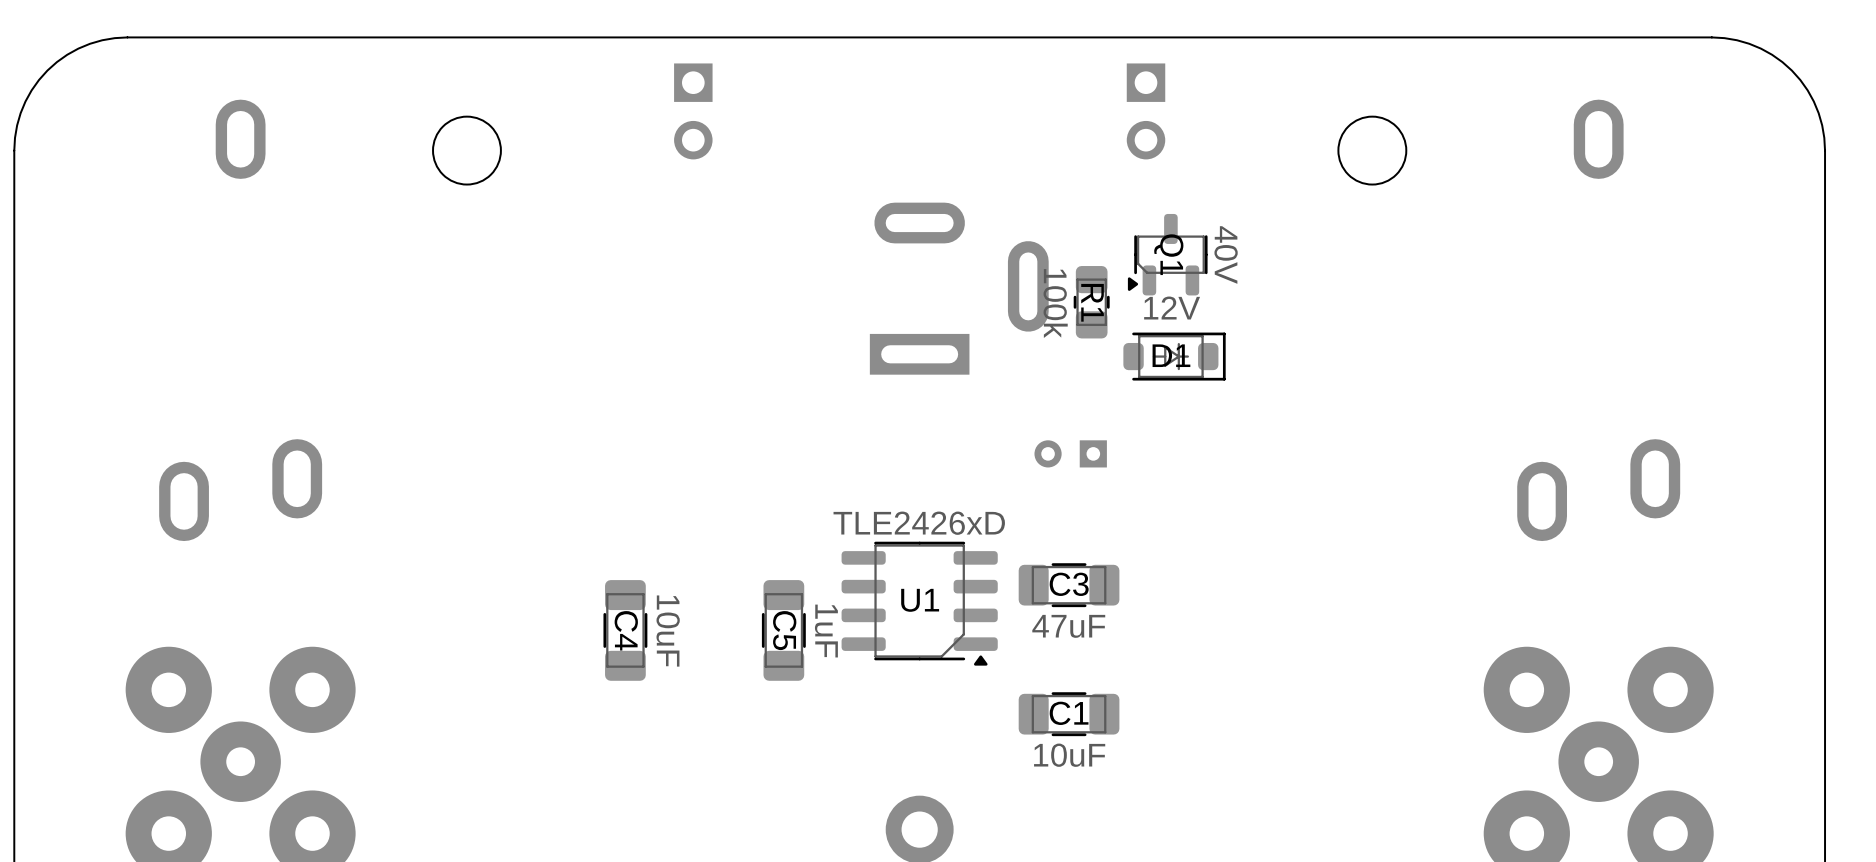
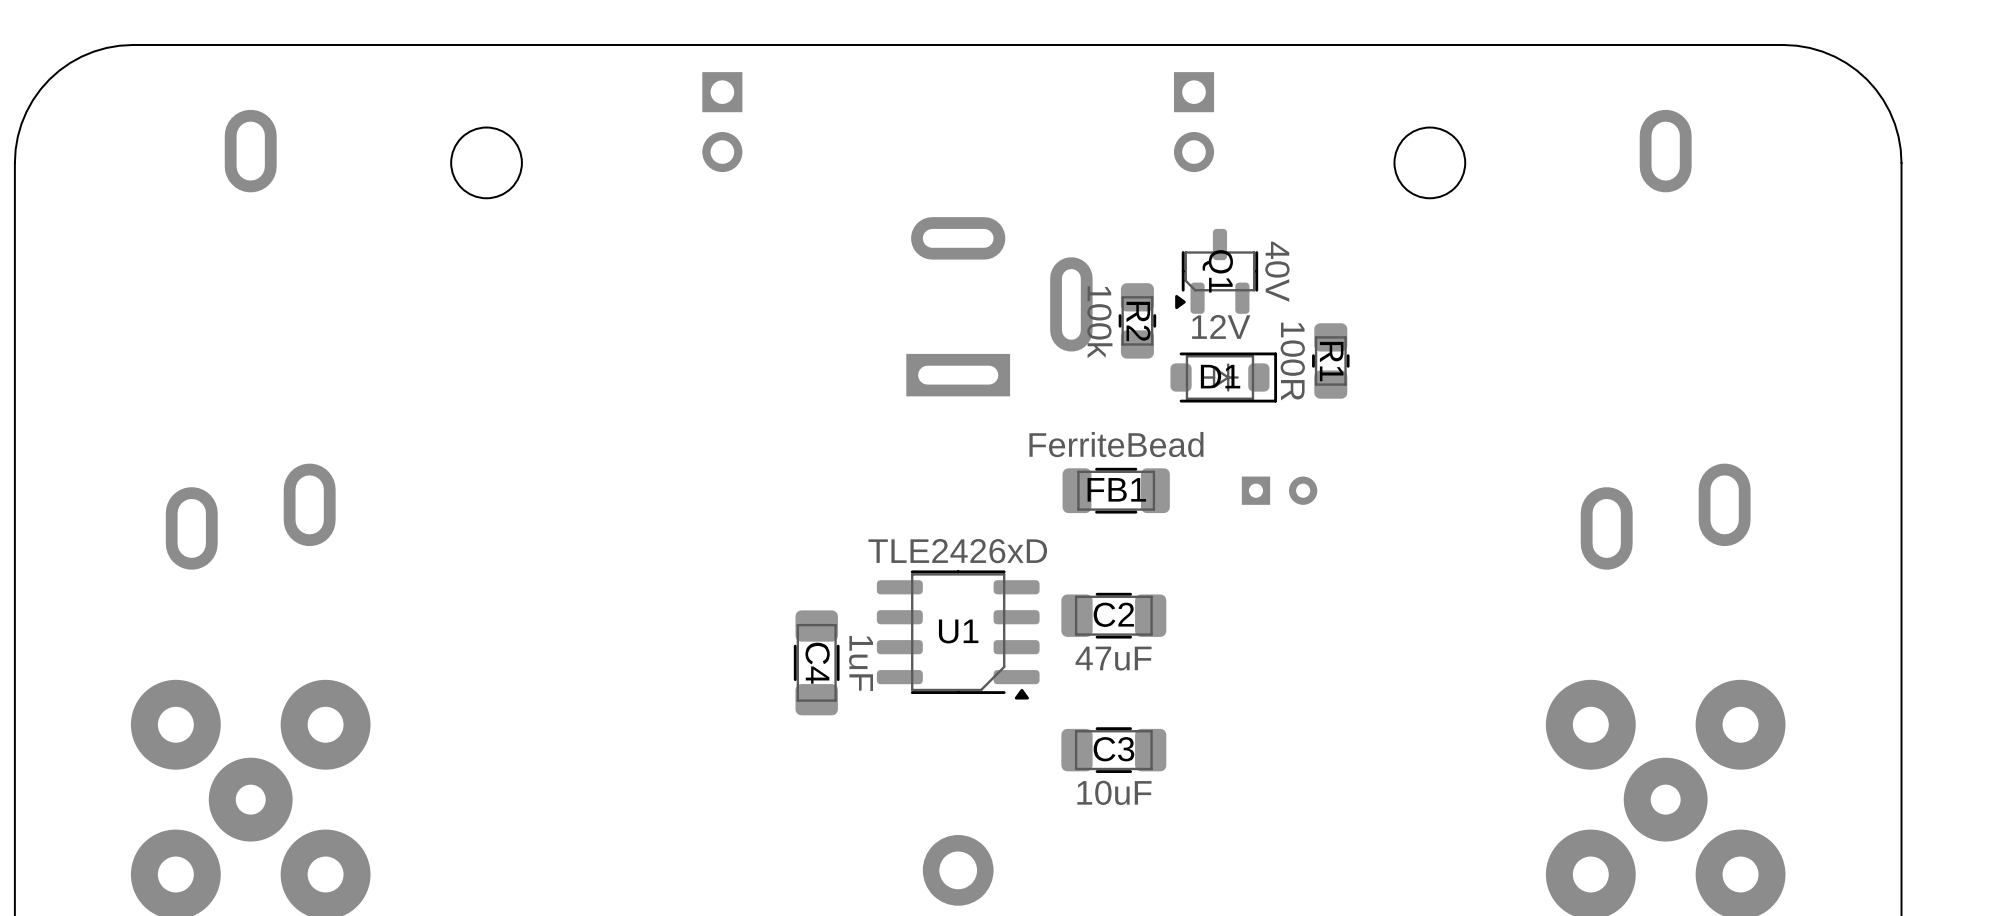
R1 name: R1 (1092, 302) -> R2 (1138, 321)
R1: none -> 100R (1330, 360)
part rotation: 0° (1070, 453) -> 180° (1279, 490)
part position: (1070, 453) -> (1279, 490)
FB1: none -> FerriteBead (1116, 490)
C3 name: C3 (1069, 584) -> C2 (1113, 614)
C4: 10uF (625, 630) -> none
C5 name: C5 (784, 630) -> C4 (817, 663)
C1 name: C1 (1069, 713) -> C3 (1113, 749)

